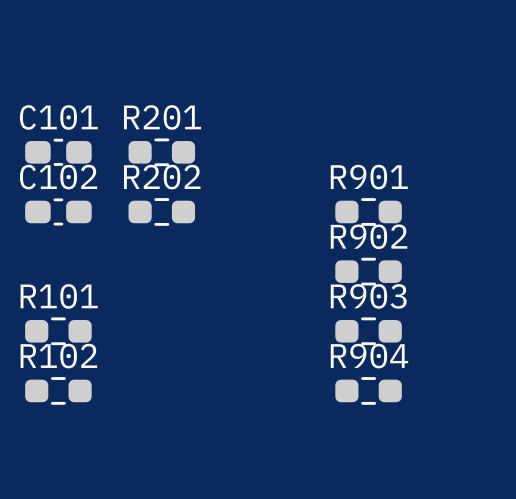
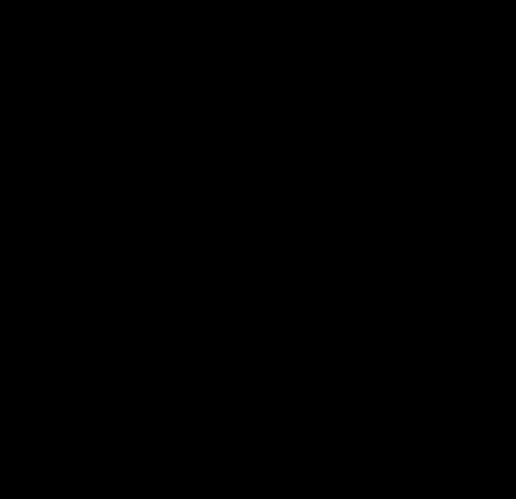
C101: (58, 152) -> none
R201: (161, 152) -> none
C102: (58, 211) -> none
R202: (161, 211) -> none
R901: (368, 211) -> none
R902: (368, 271) -> none
R101: (58, 331) -> none
R903: (368, 331) -> none
R102: (58, 390) -> none
R904: (368, 390) -> none

